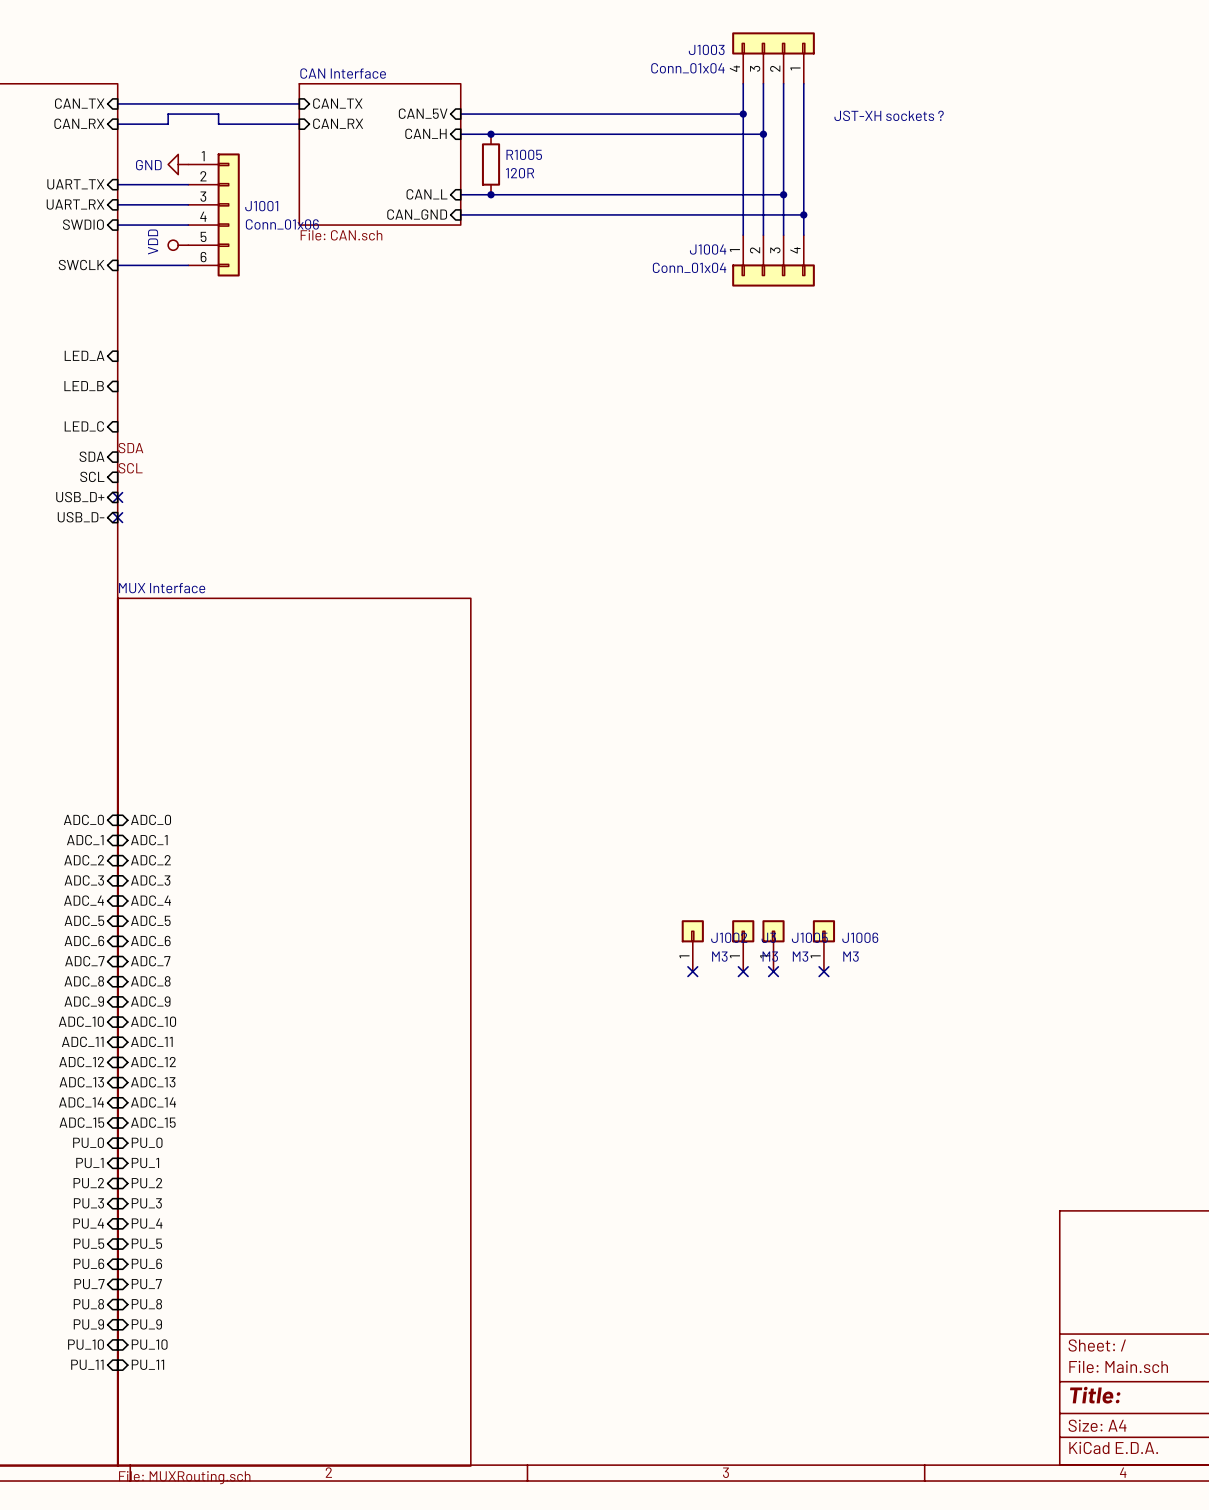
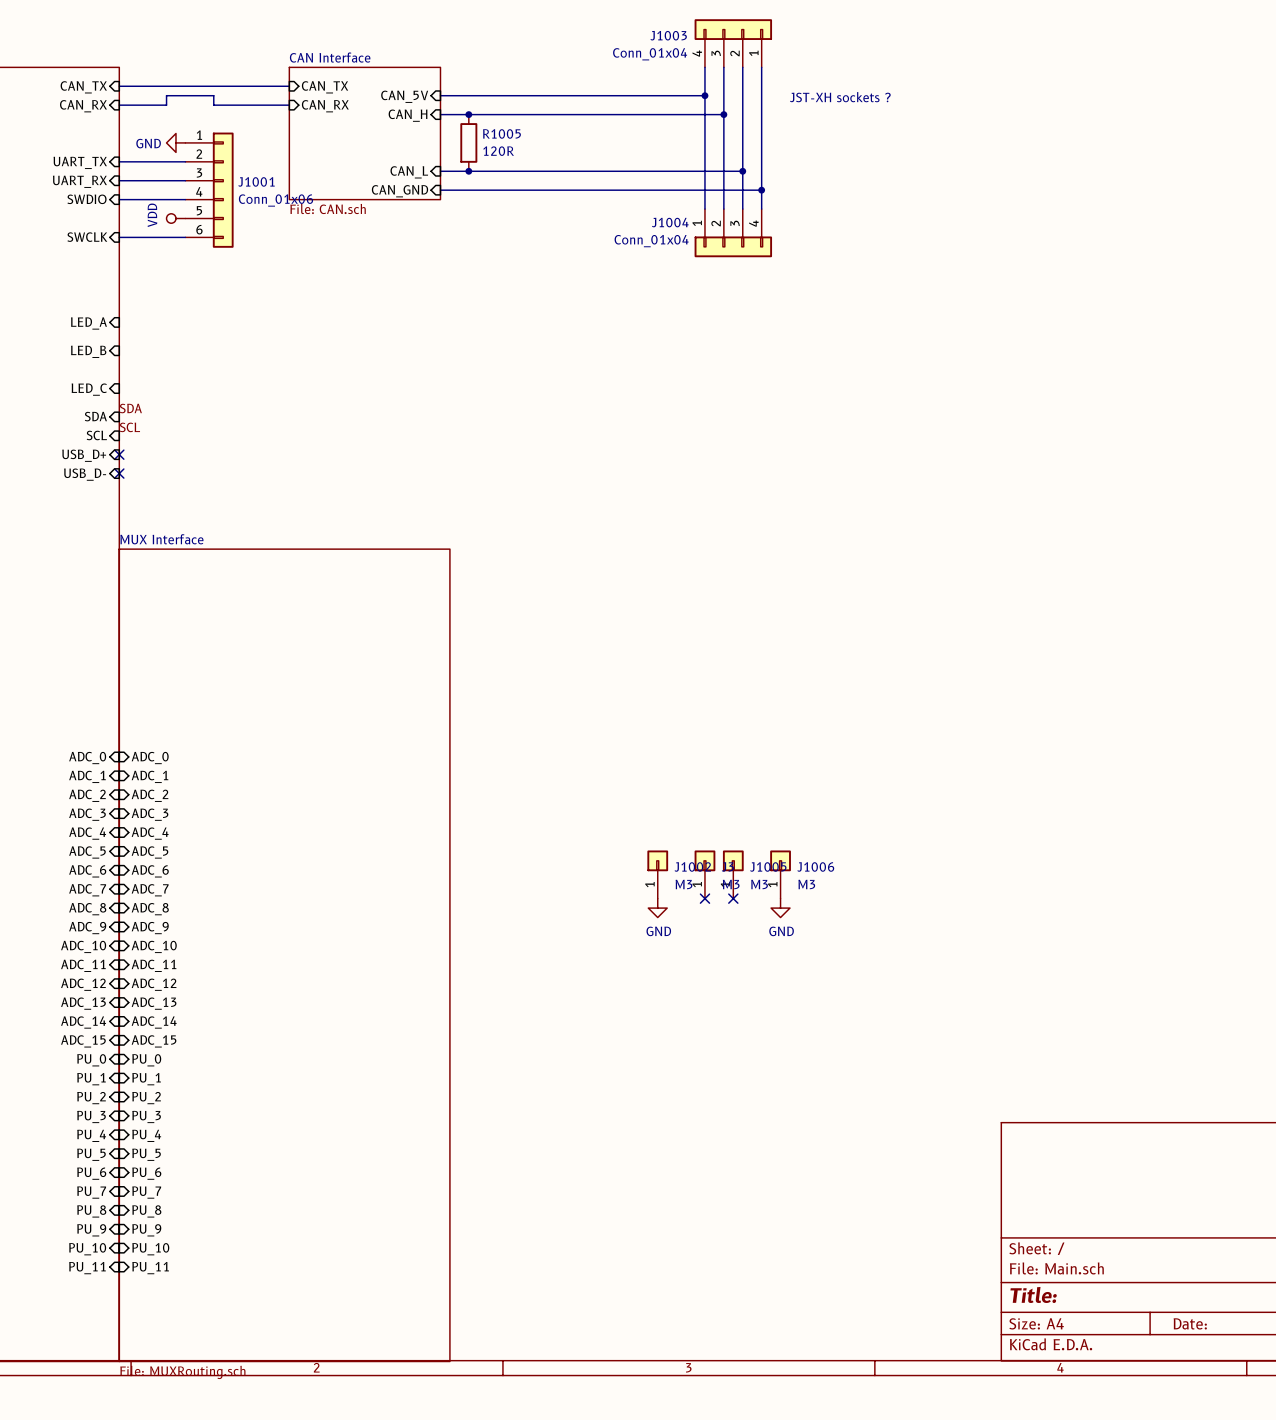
no-connect mark: (692, 971) -> none
no-connect mark: (823, 971) -> none
power symbol: none -> GND (657, 908)
power symbol: none -> GND (780, 908)

